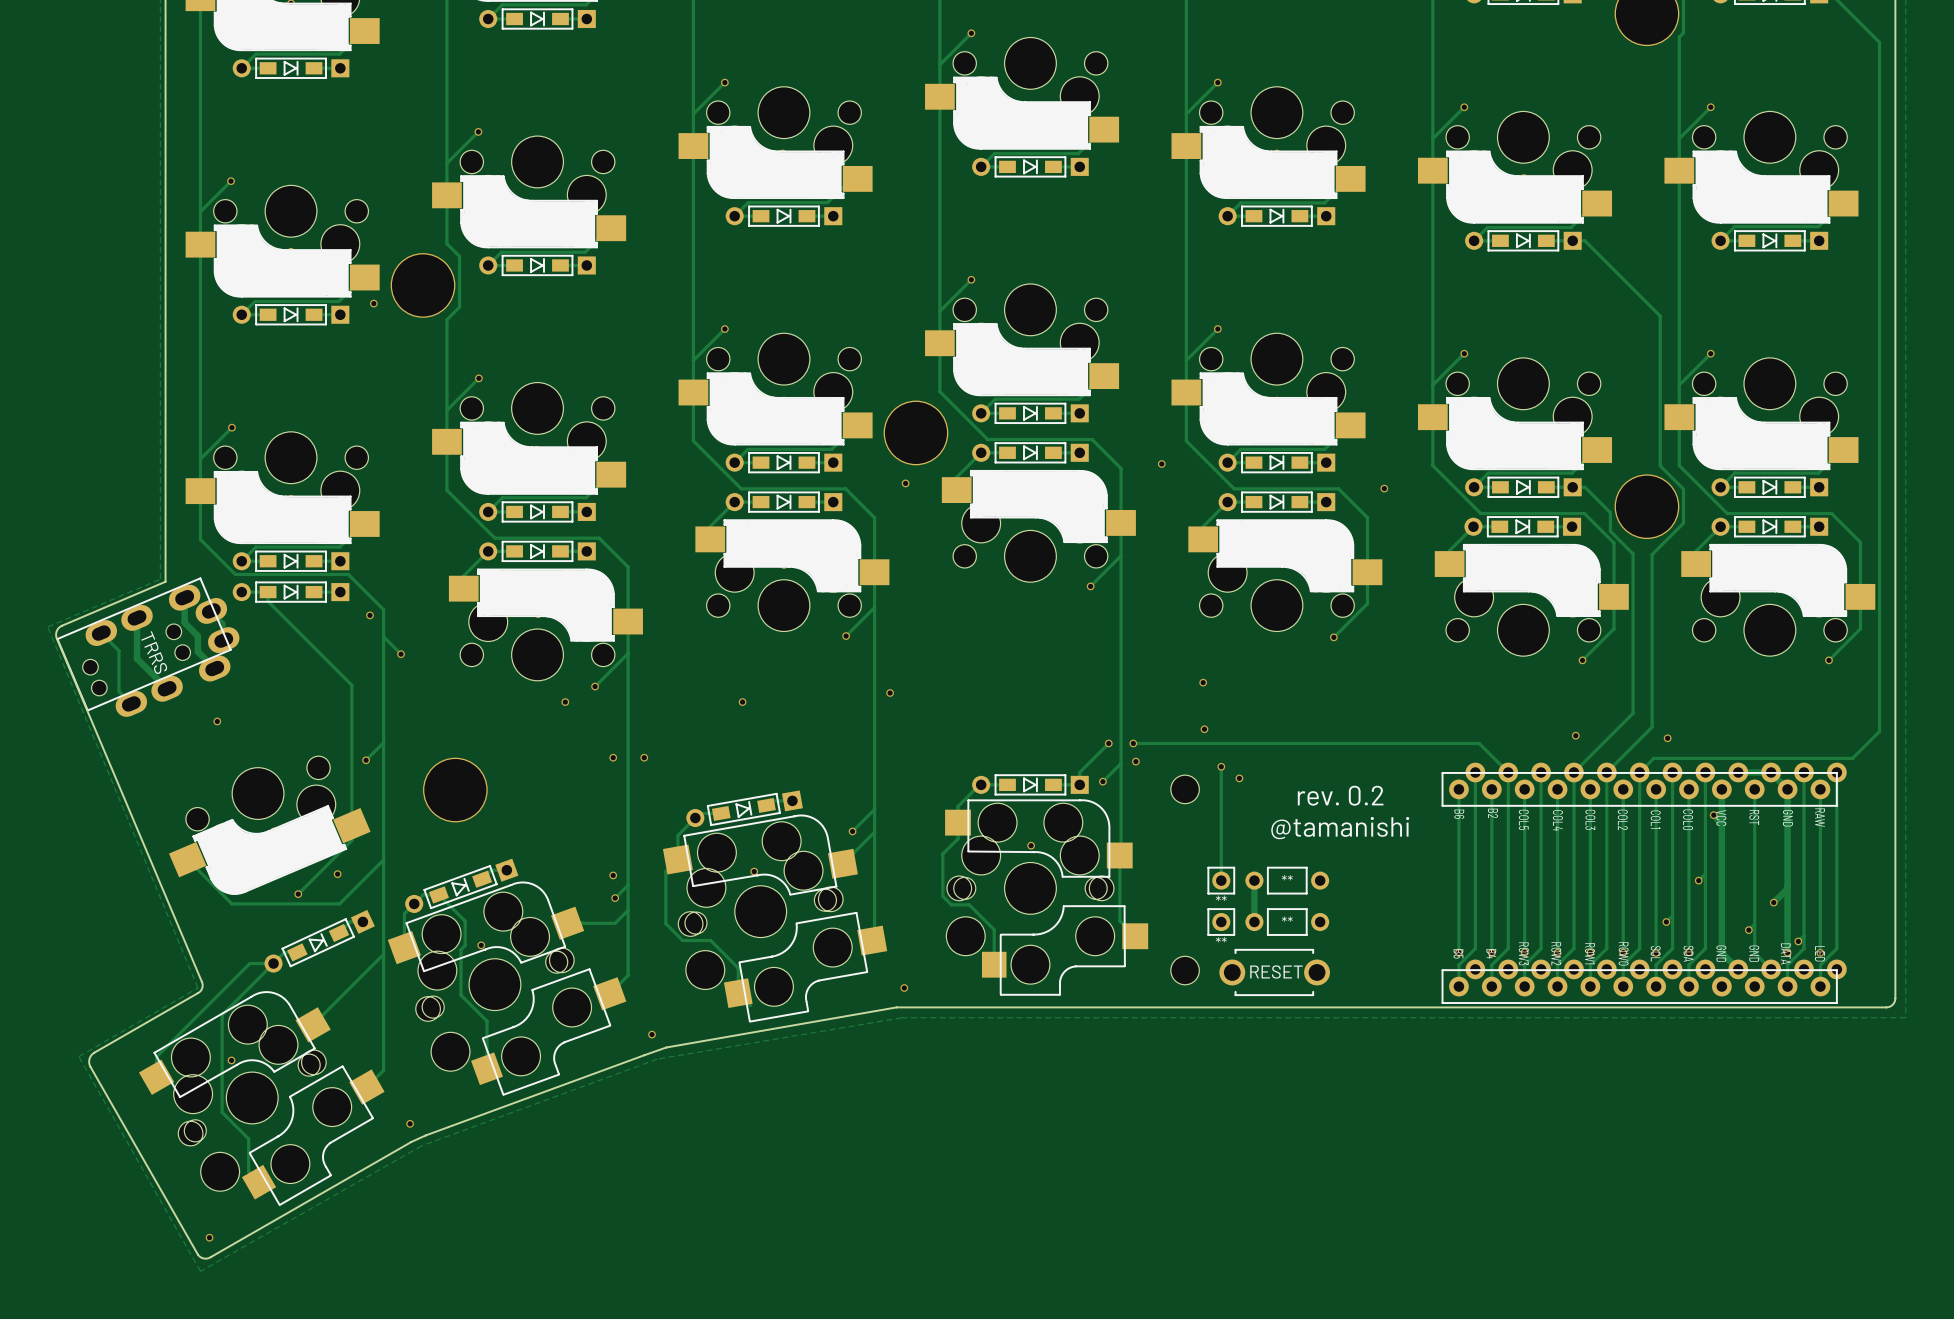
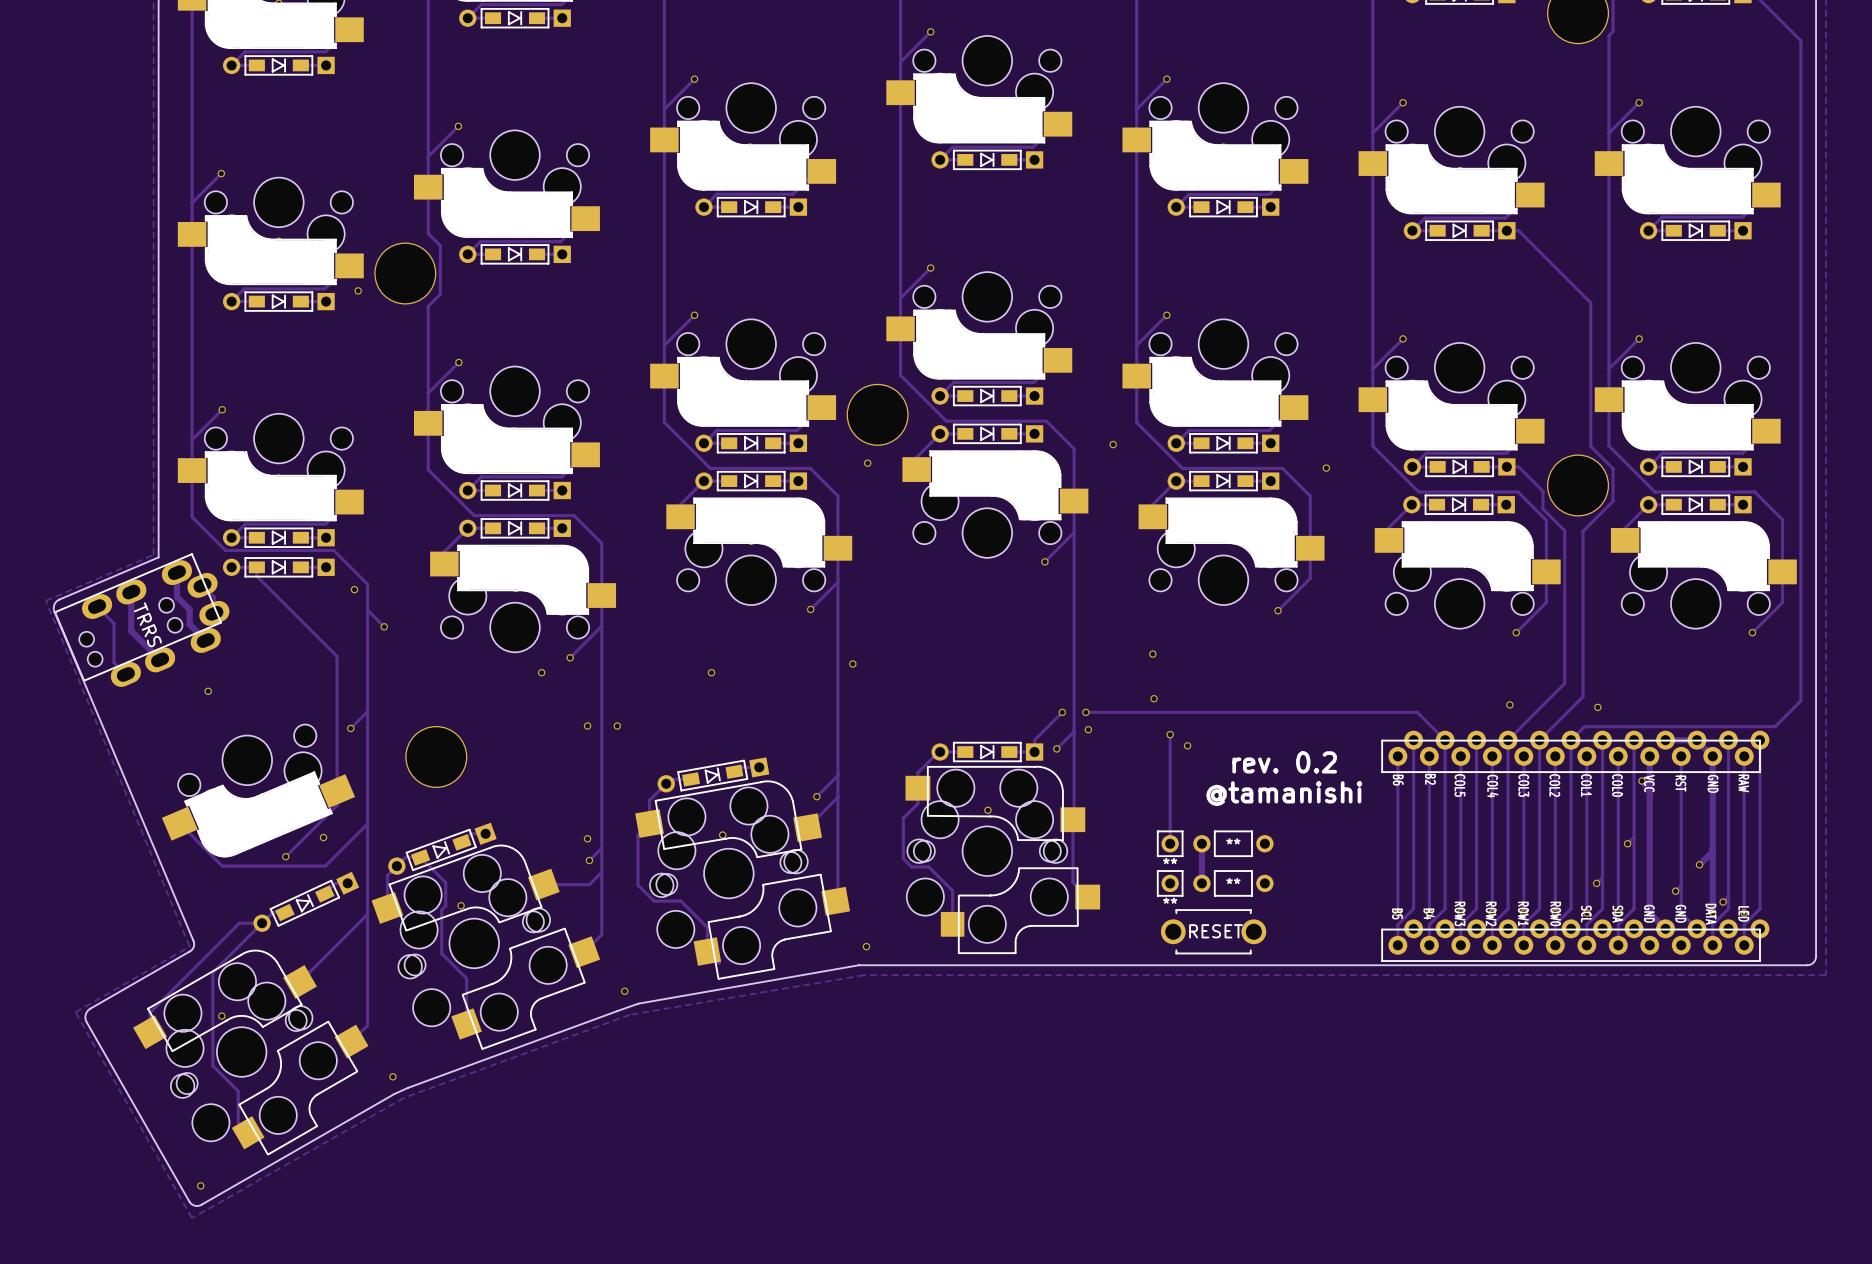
part: (1185, 789) -> none
part footprint: [1219, 948, 1330, 997] -> [1160, 909, 1267, 955]
part: (1185, 970) -> none

